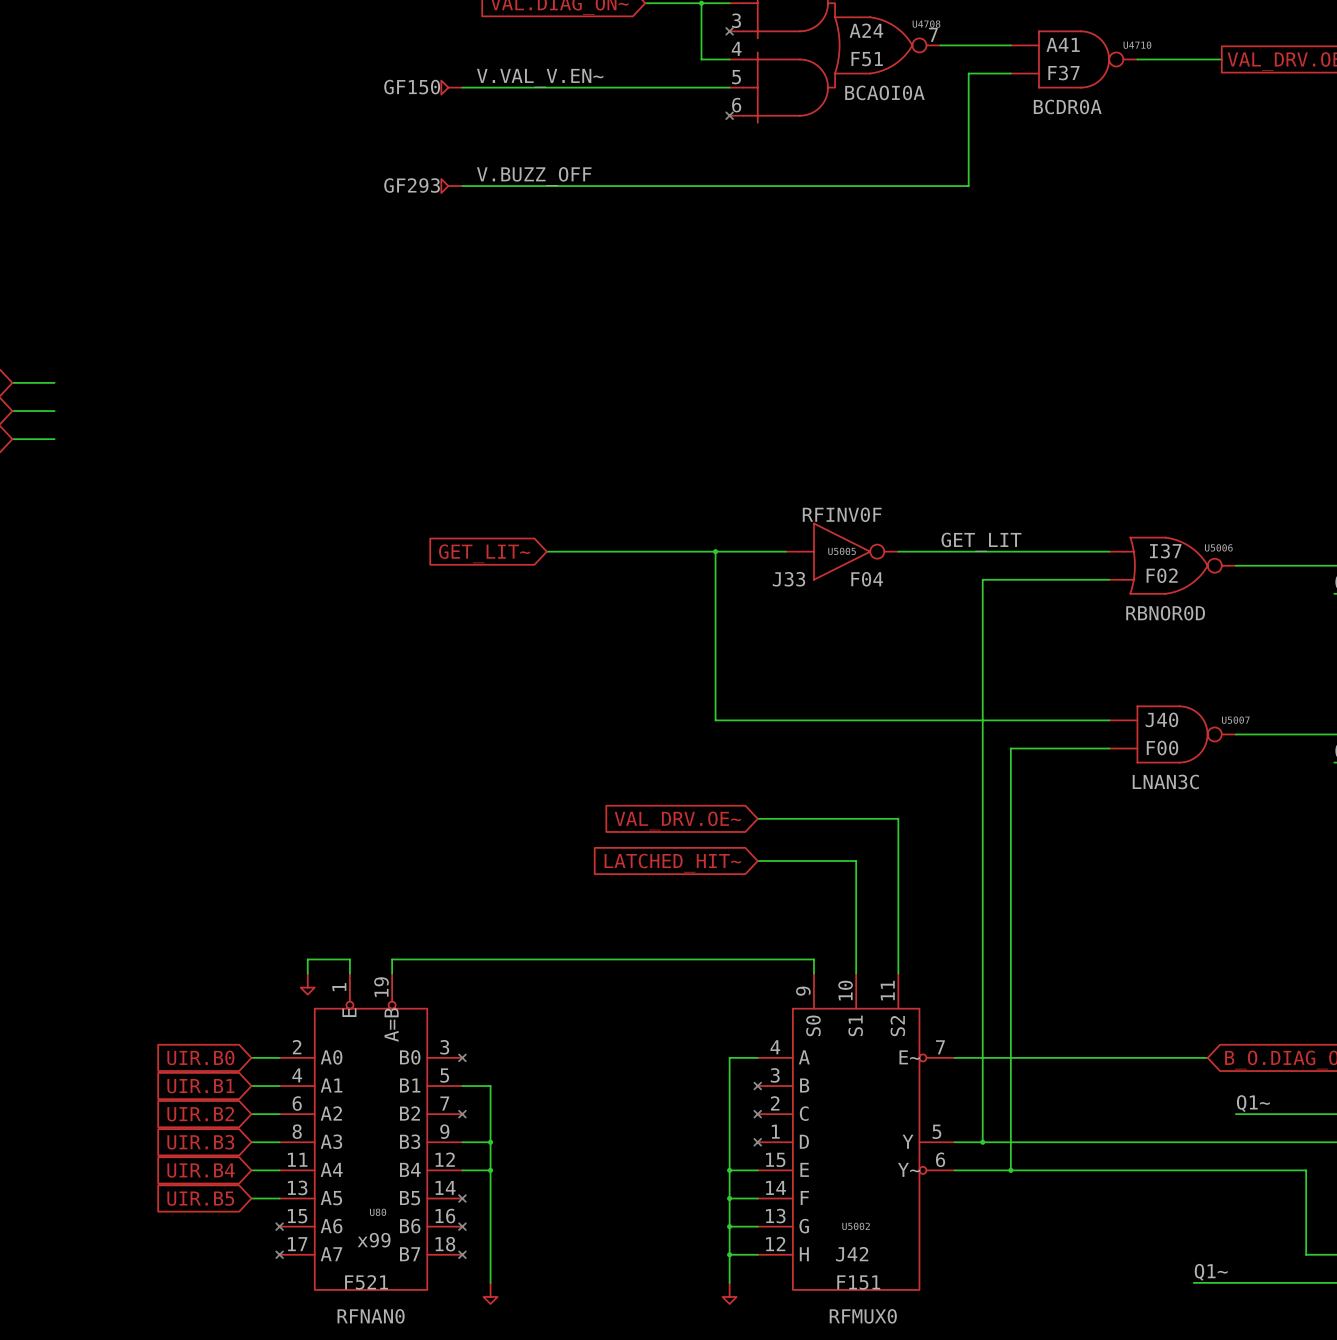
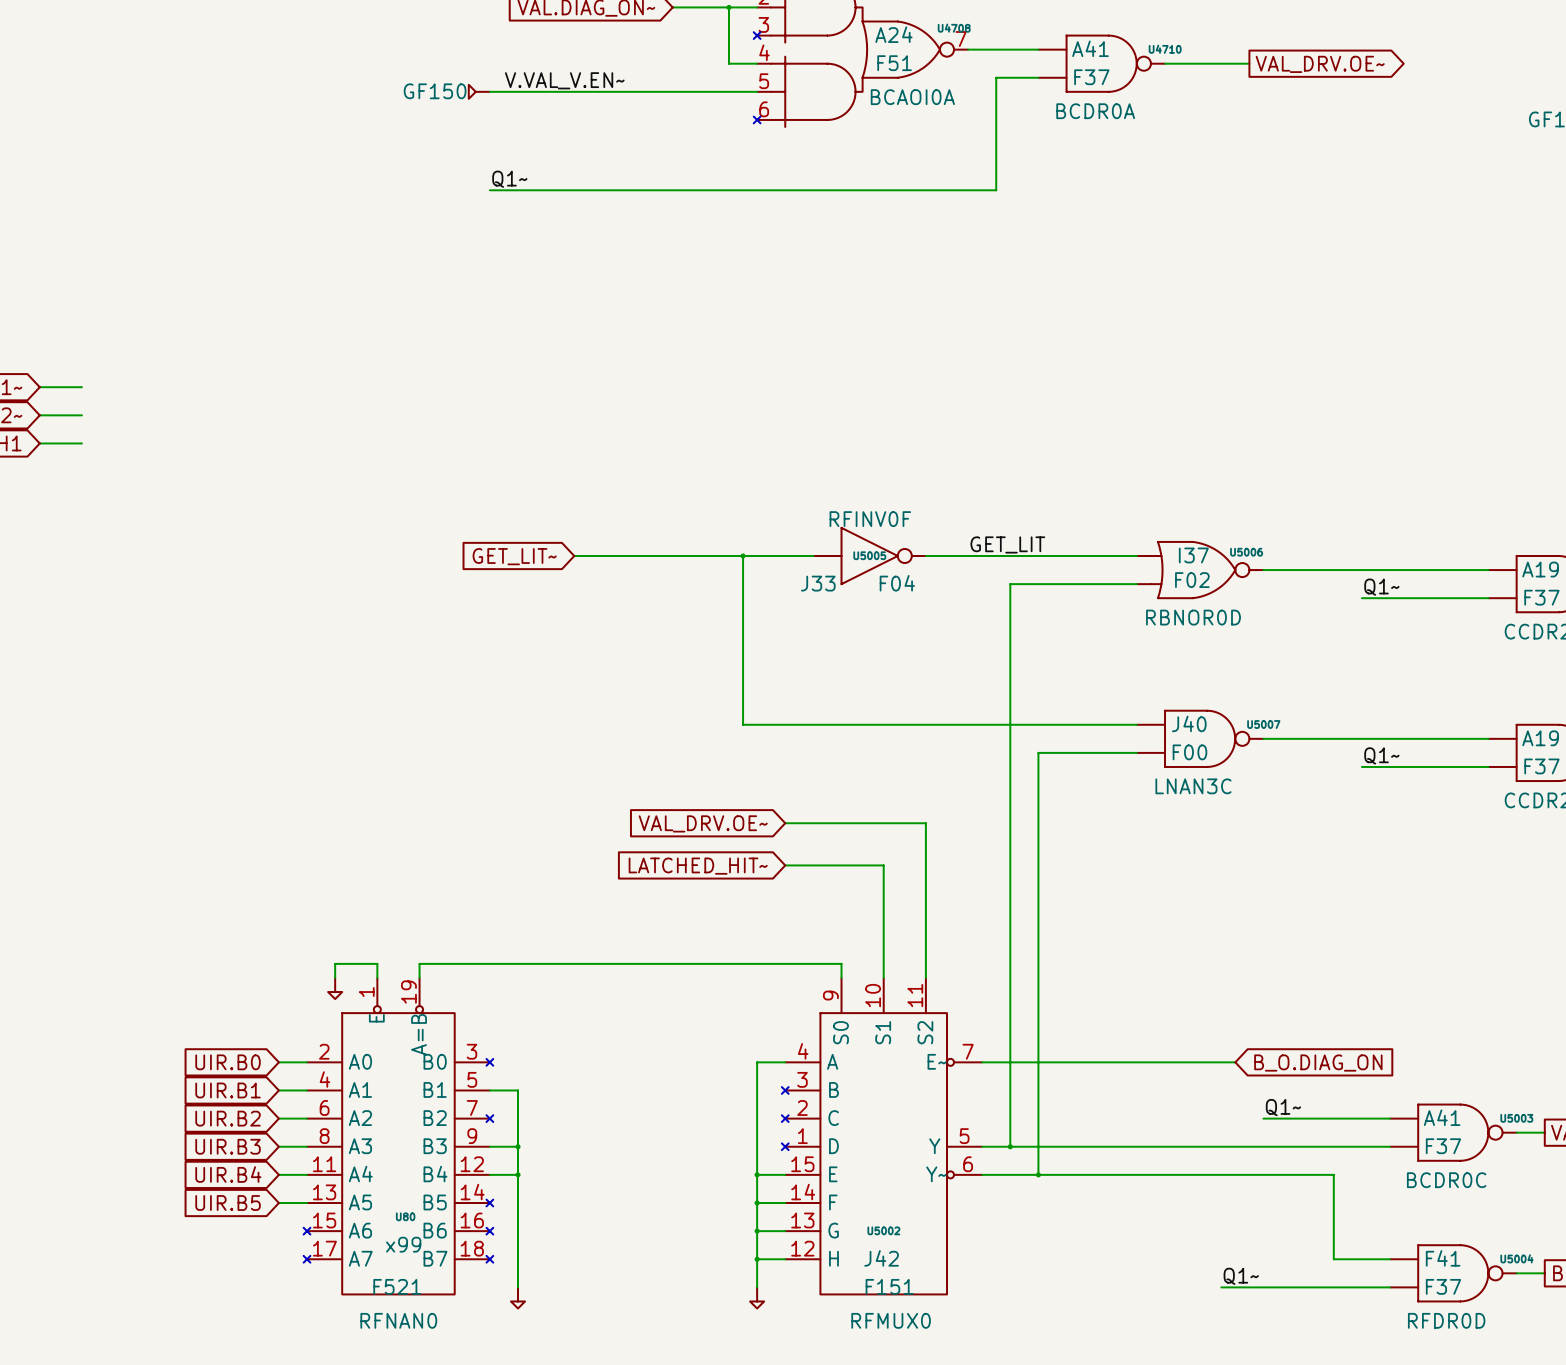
label: none -> Q1~ (509, 179)
label: V.BUZZ_OFF (534, 176) -> none
GF293: (451, 186) -> none

